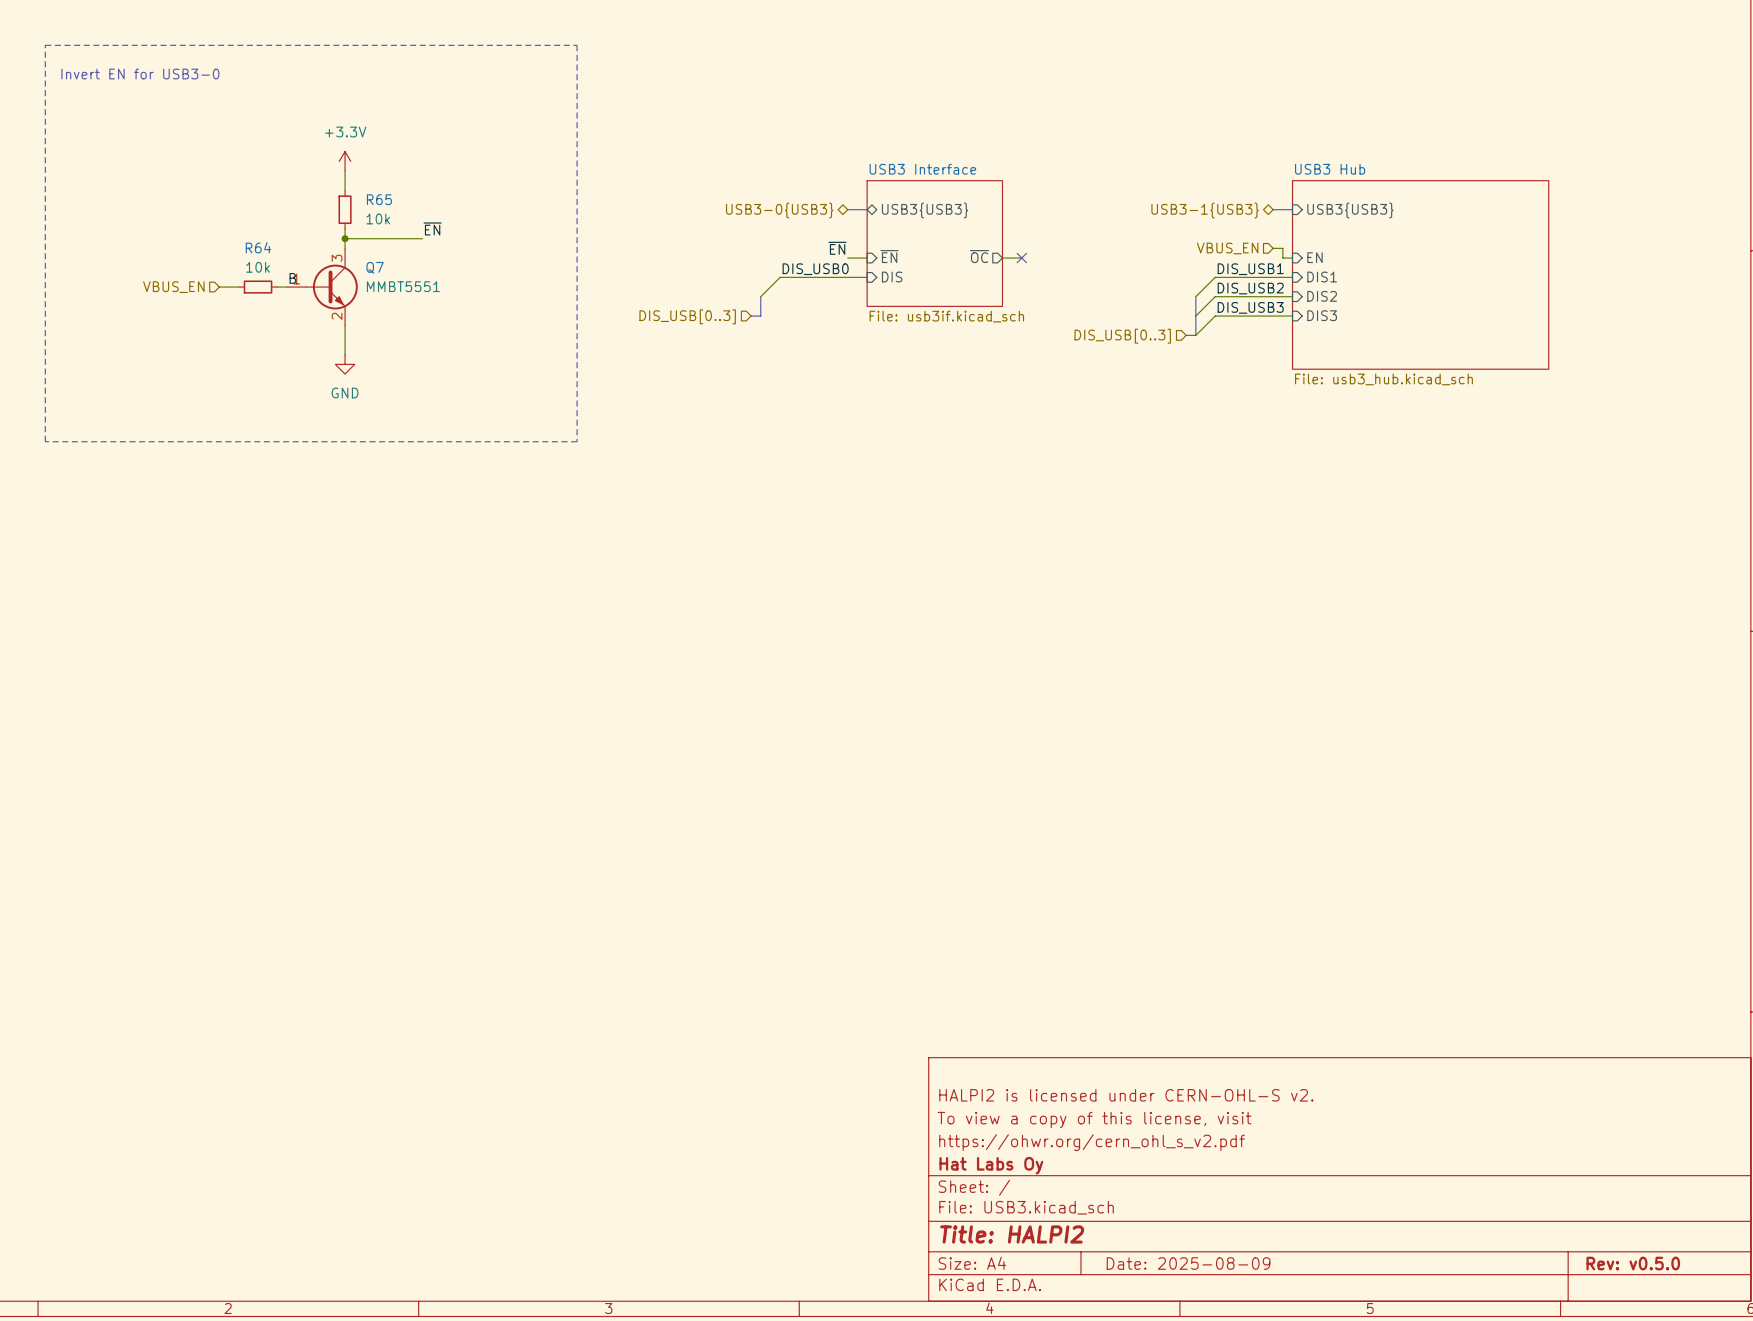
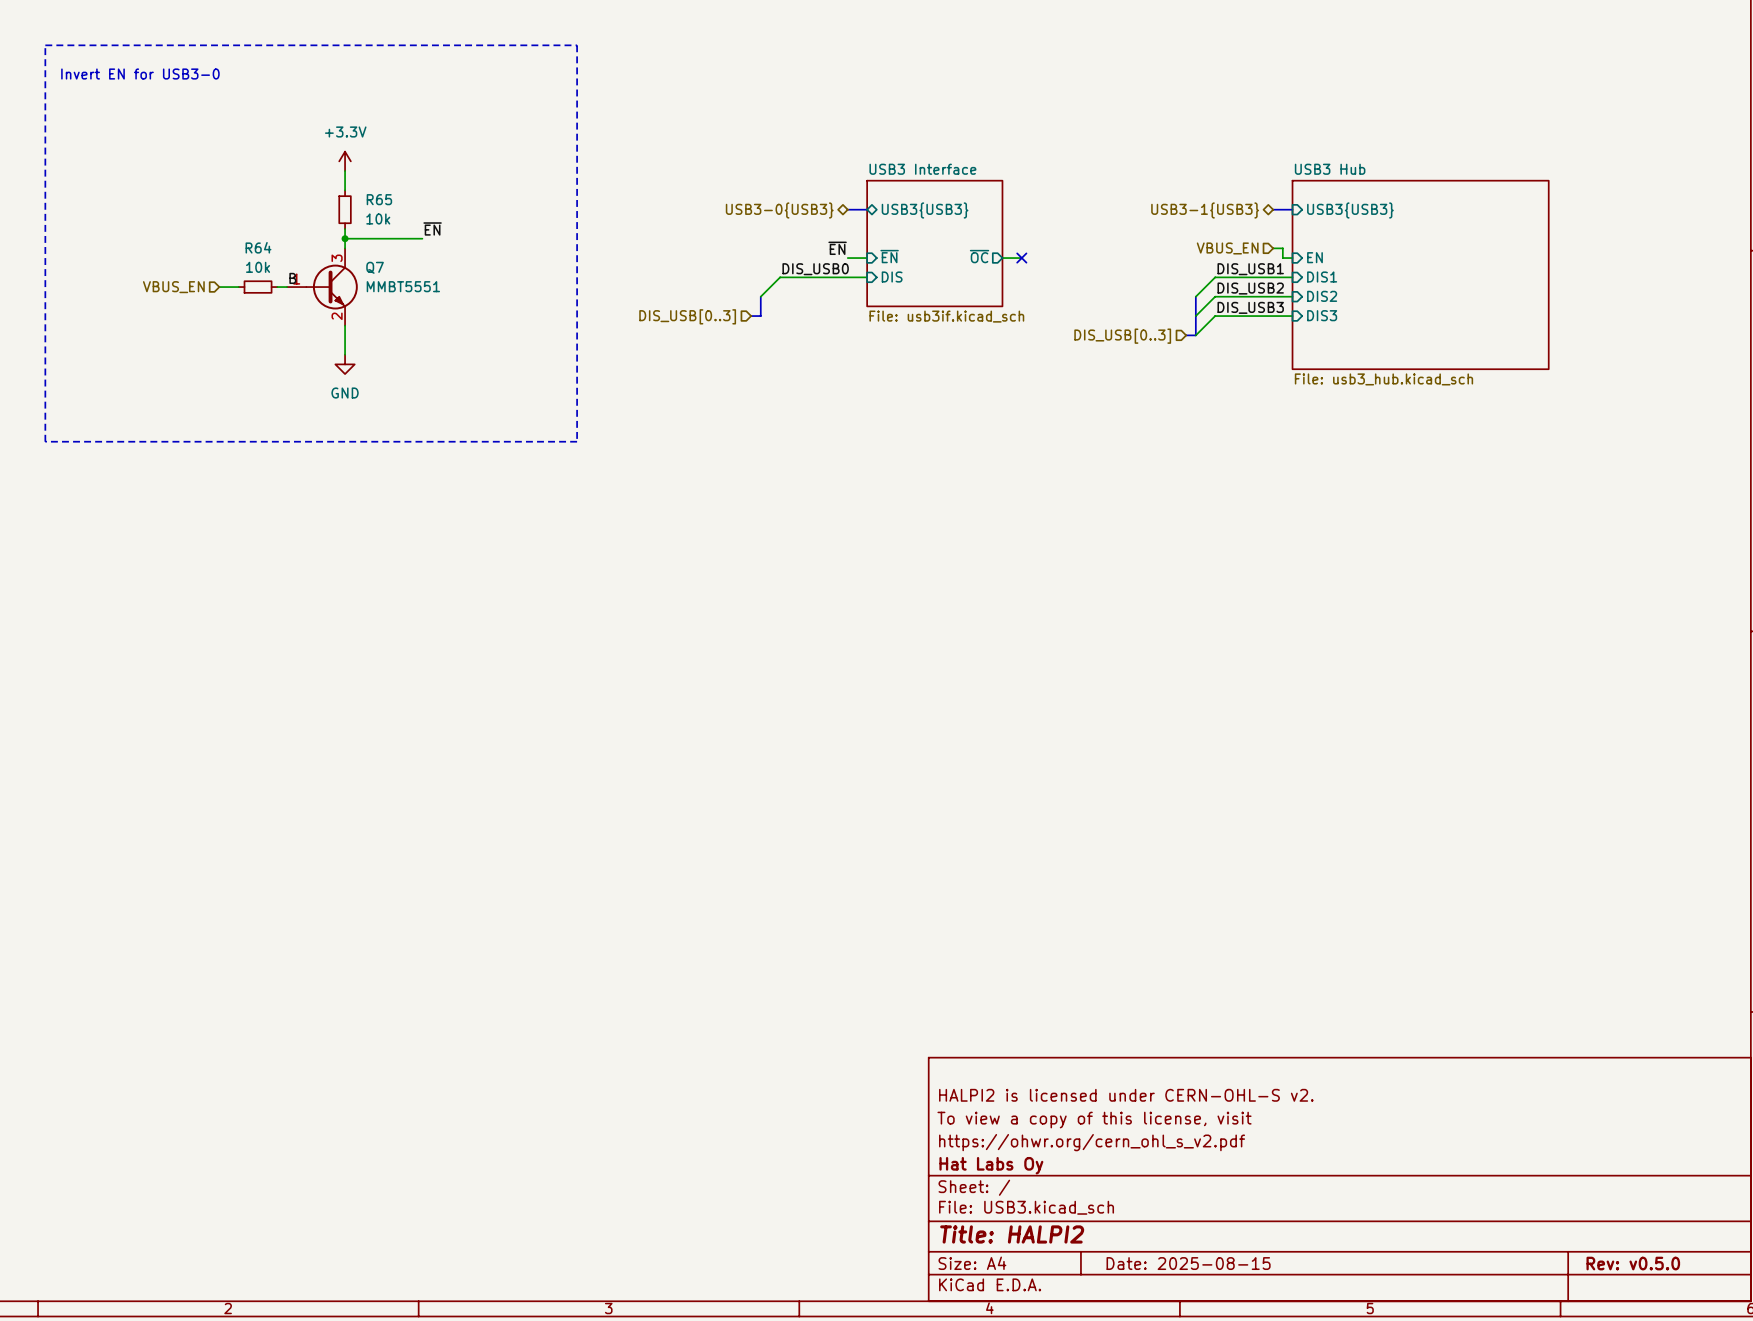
title block: Date: 2025-08-09 (1188, 1263) -> Date: 2025-08-15 (1188, 1263)

